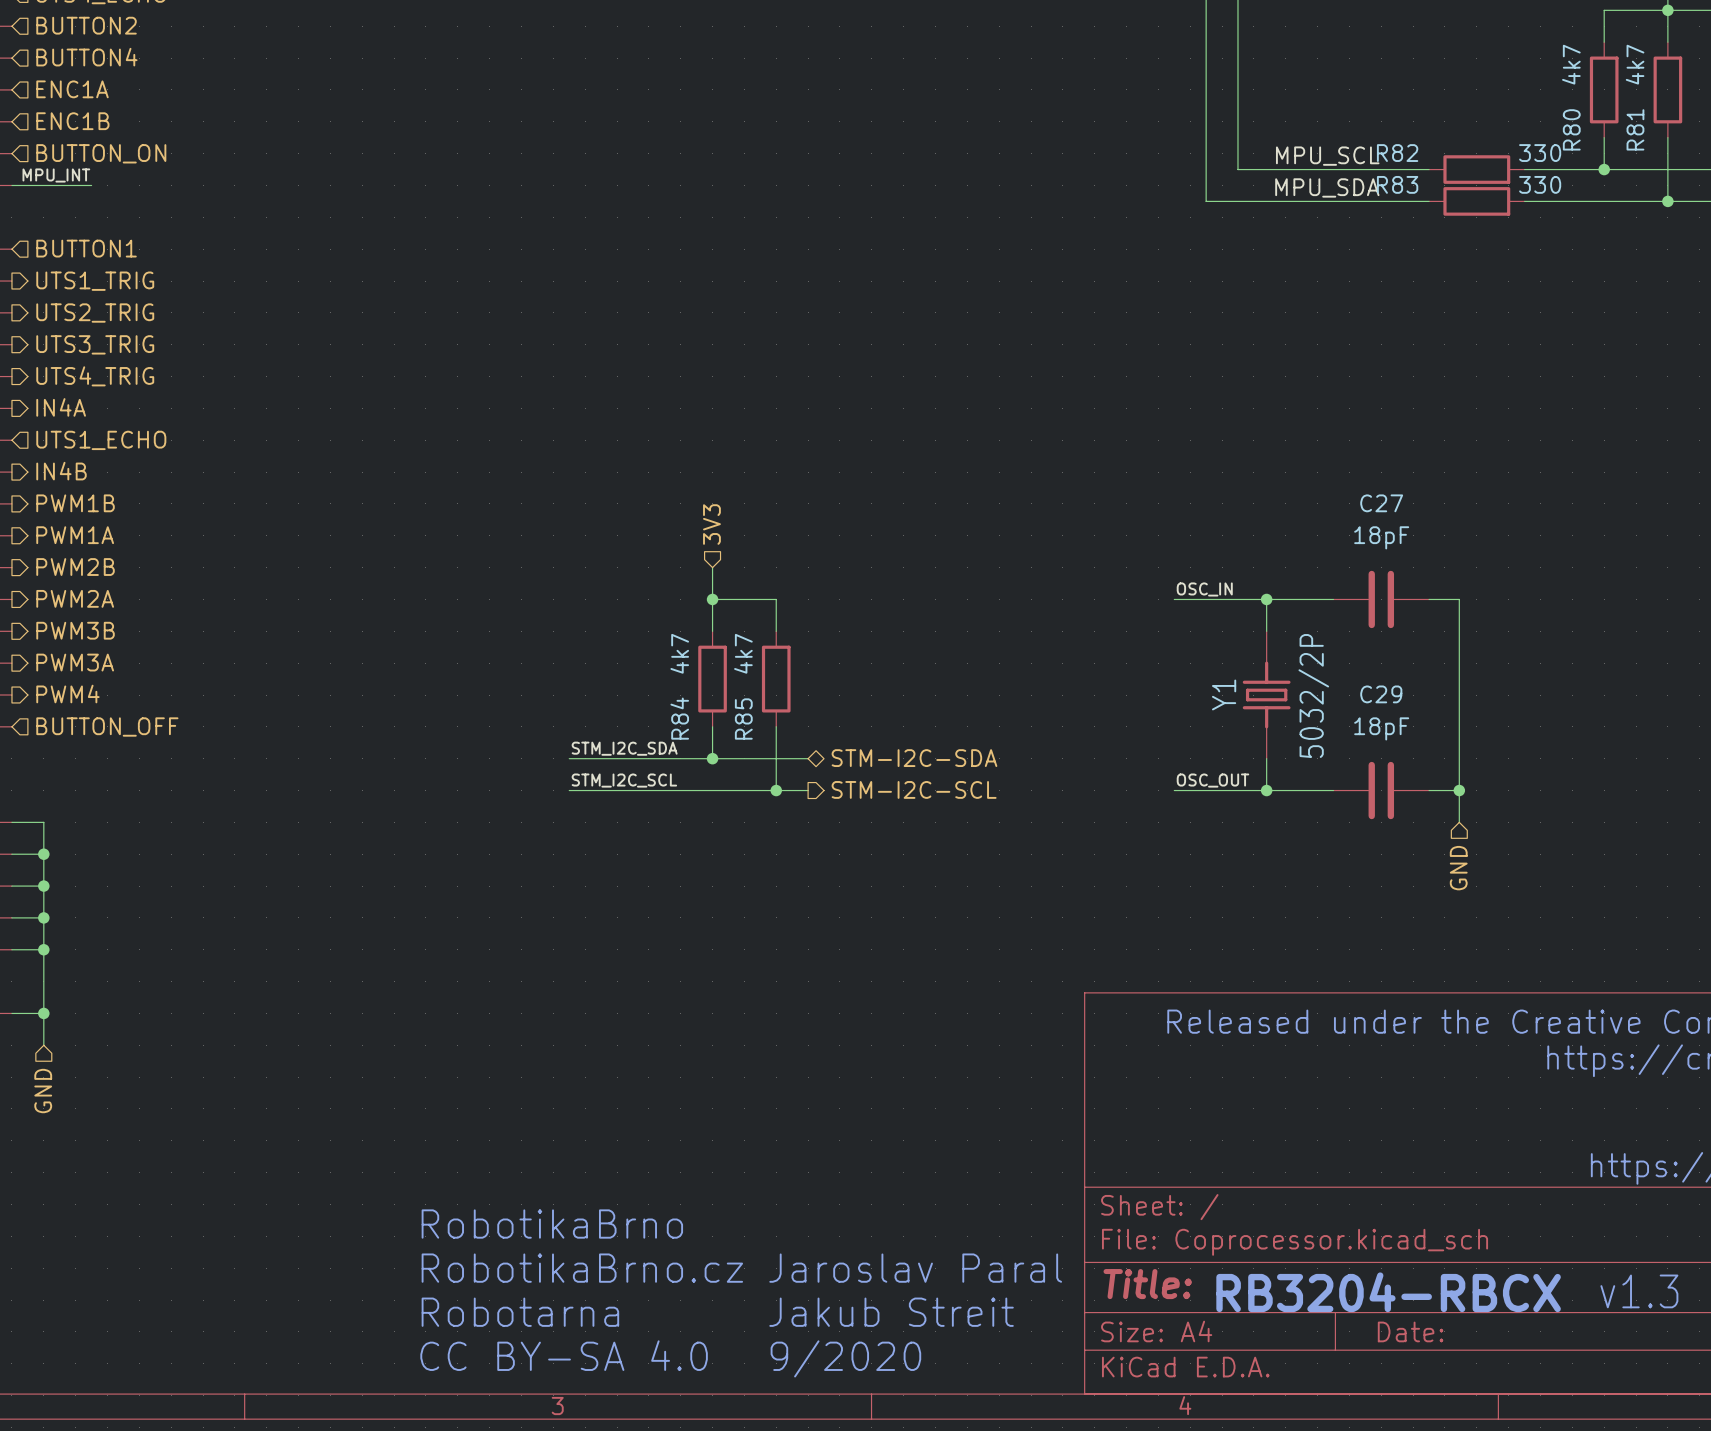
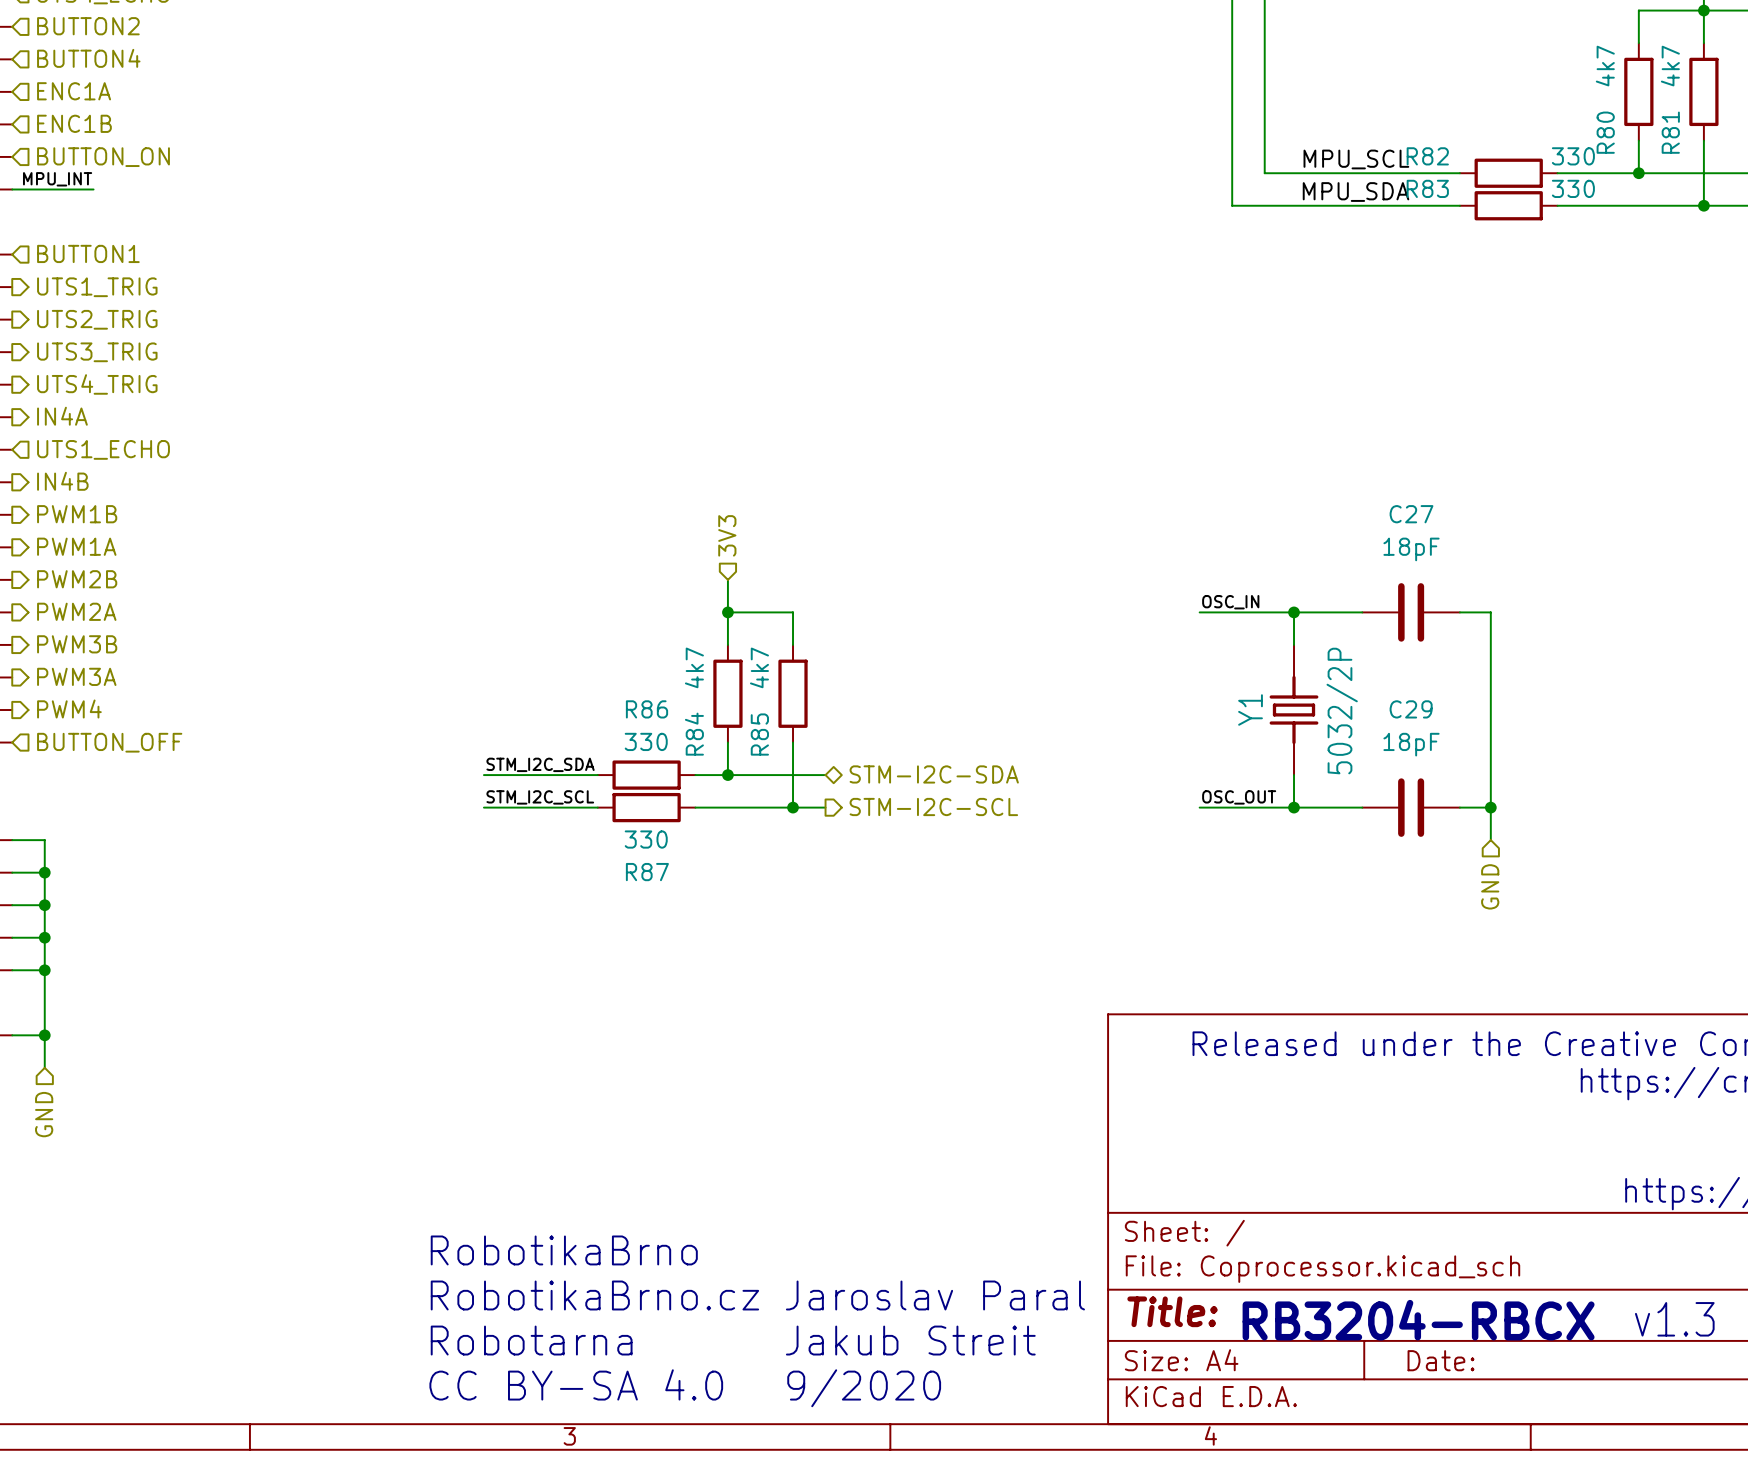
label position: STM_I2C_SDA (624, 748) -> STM_I2C_SDA (540, 764)
wire: (585, 758) (680, 758) -> (483, 775) (581, 775)
R86: none -> 330 (646, 775)
label position: STM_I2C_SCL (624, 780) -> STM_I2C_SCL (540, 797)
wire: (585, 790) (680, 790) -> (483, 807) (581, 807)
R87: none -> 330 (646, 807)

